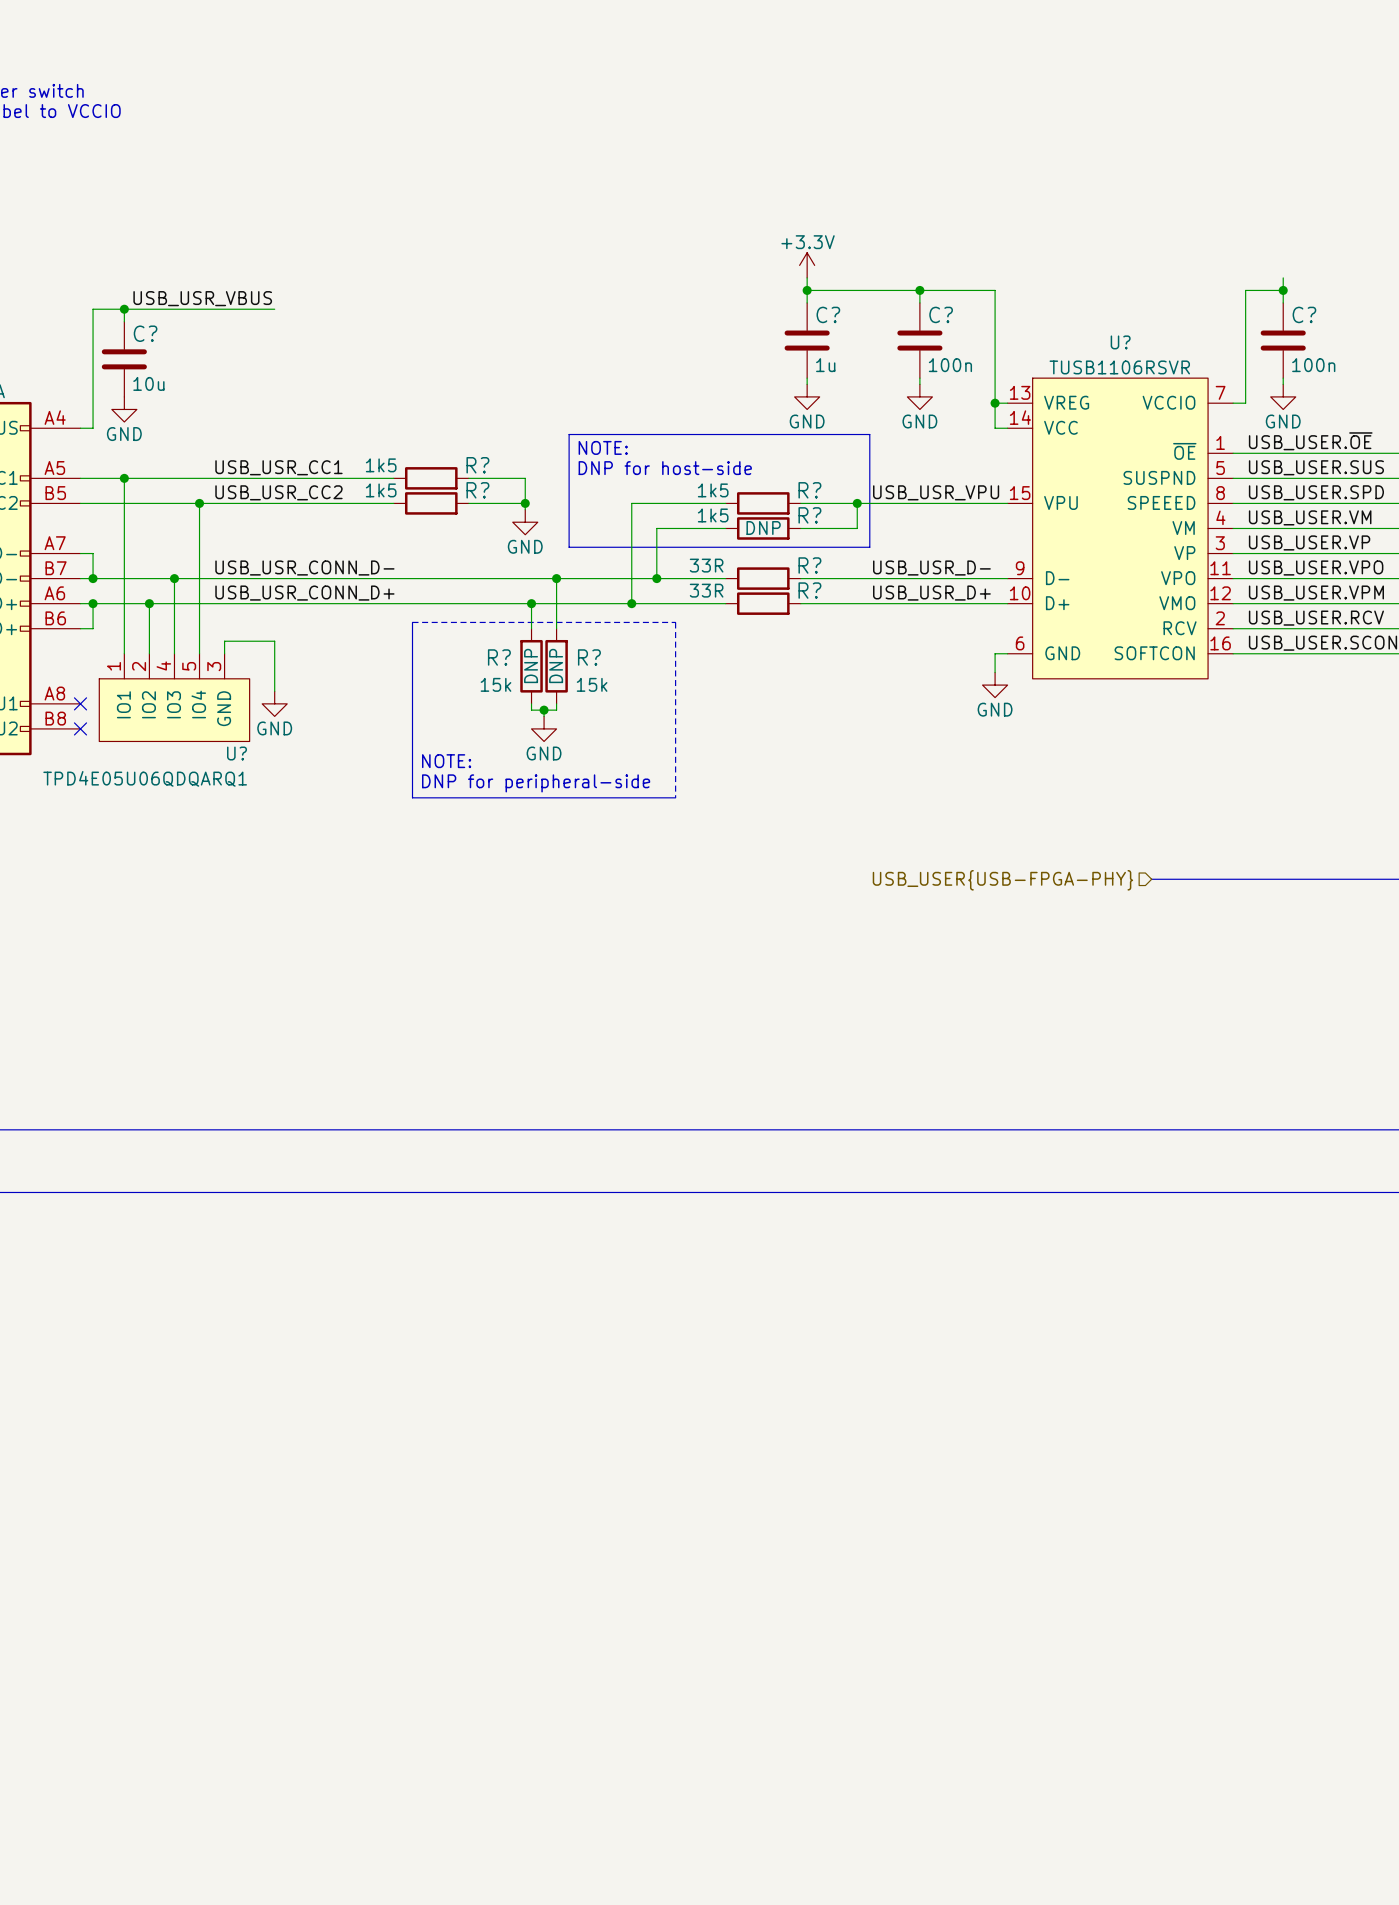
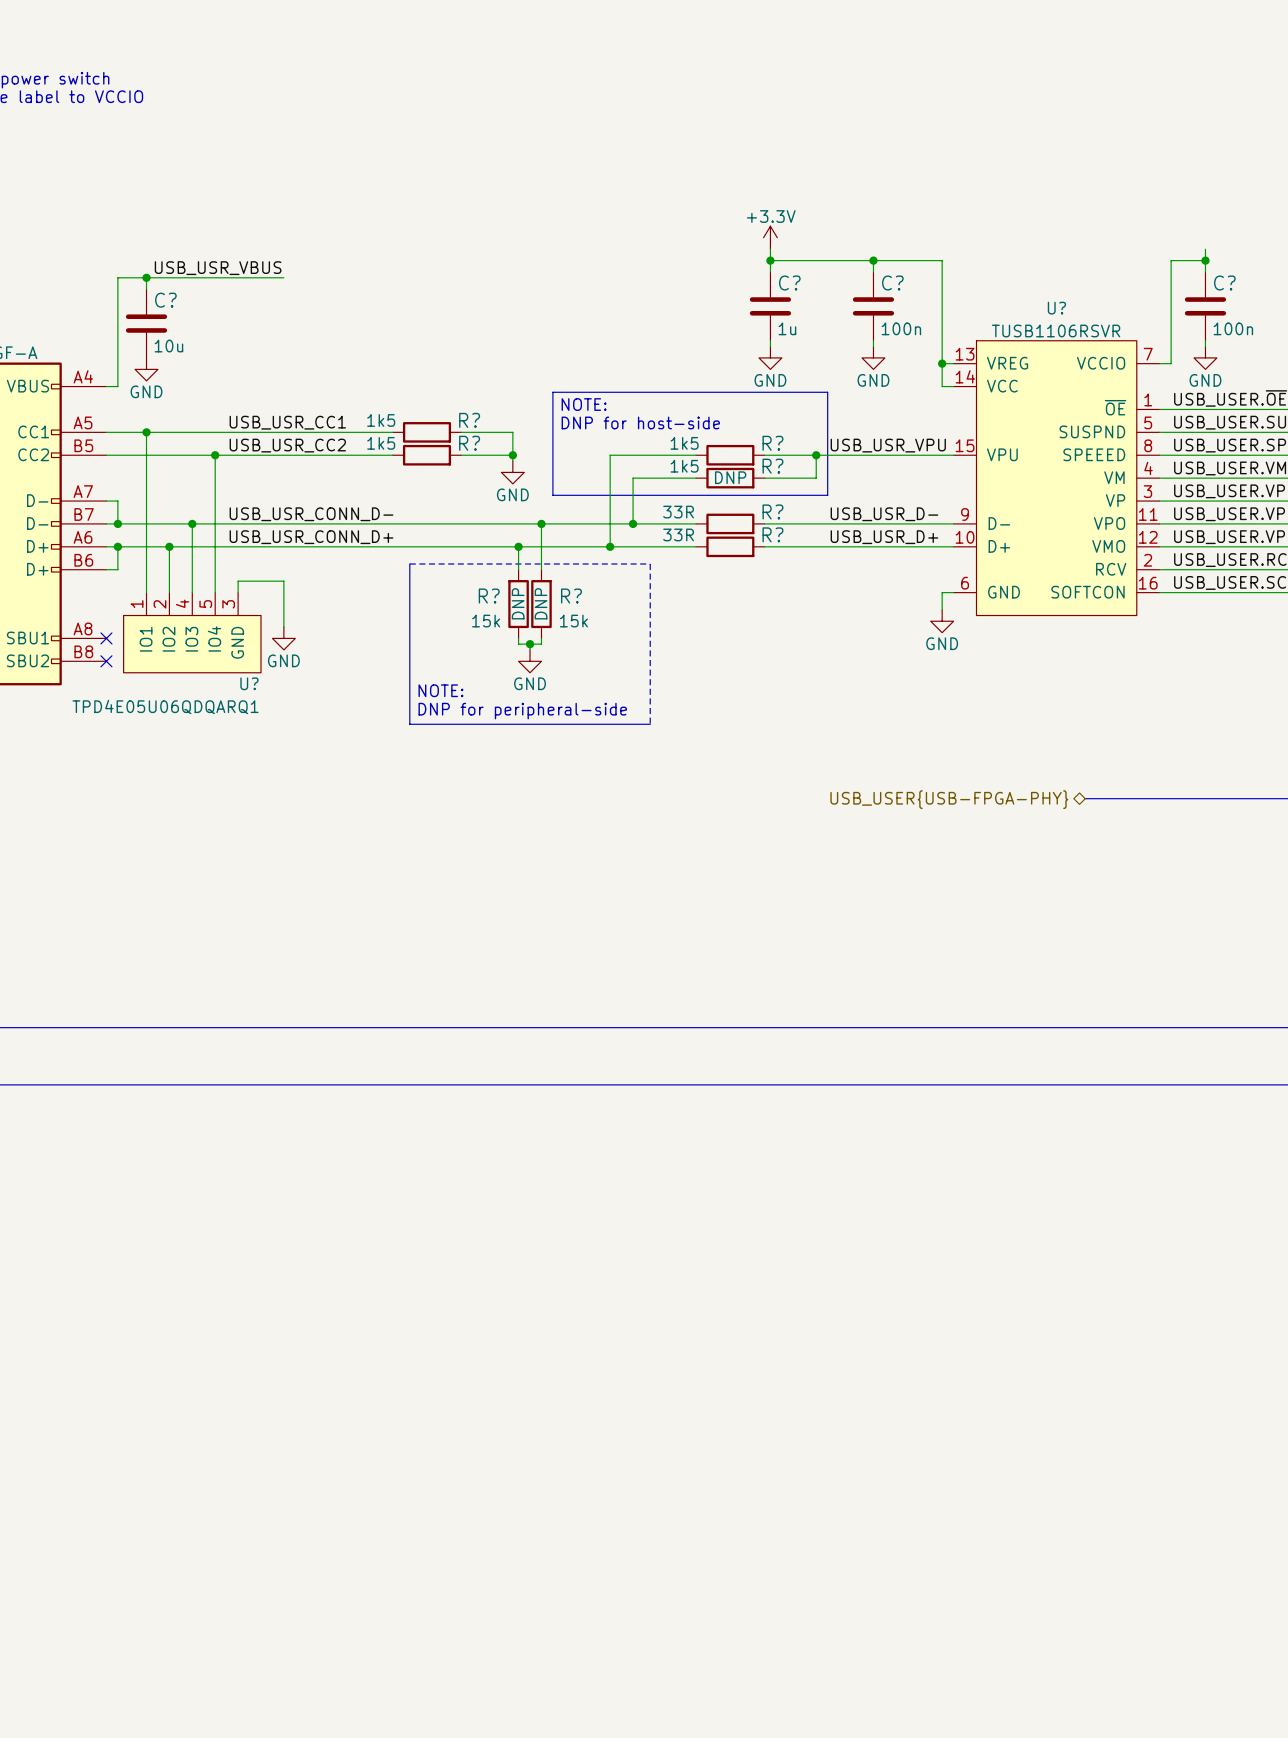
hierarchical label shape: input (1002, 880) -> bidirectional (949, 799)

